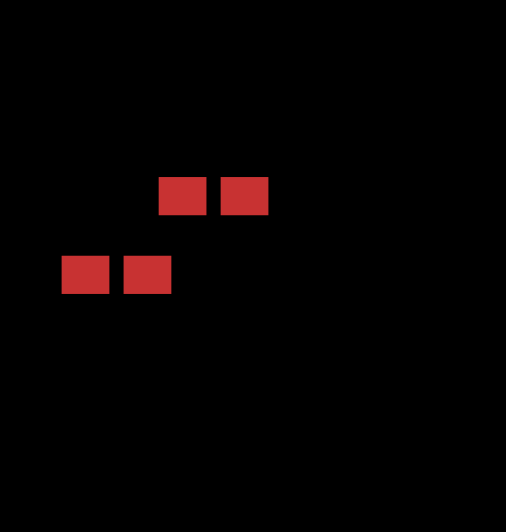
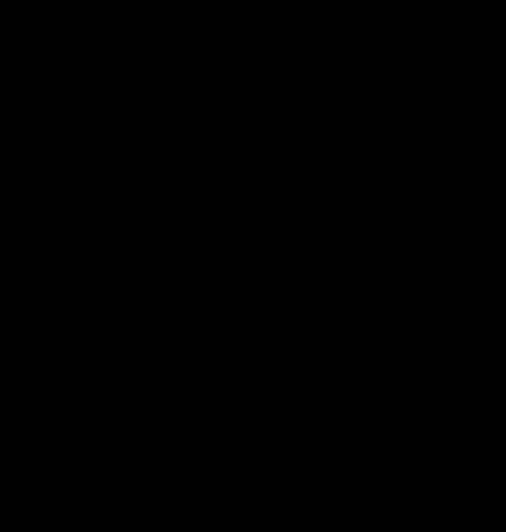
part: (213, 196) -> none
part: (116, 274) -> none

